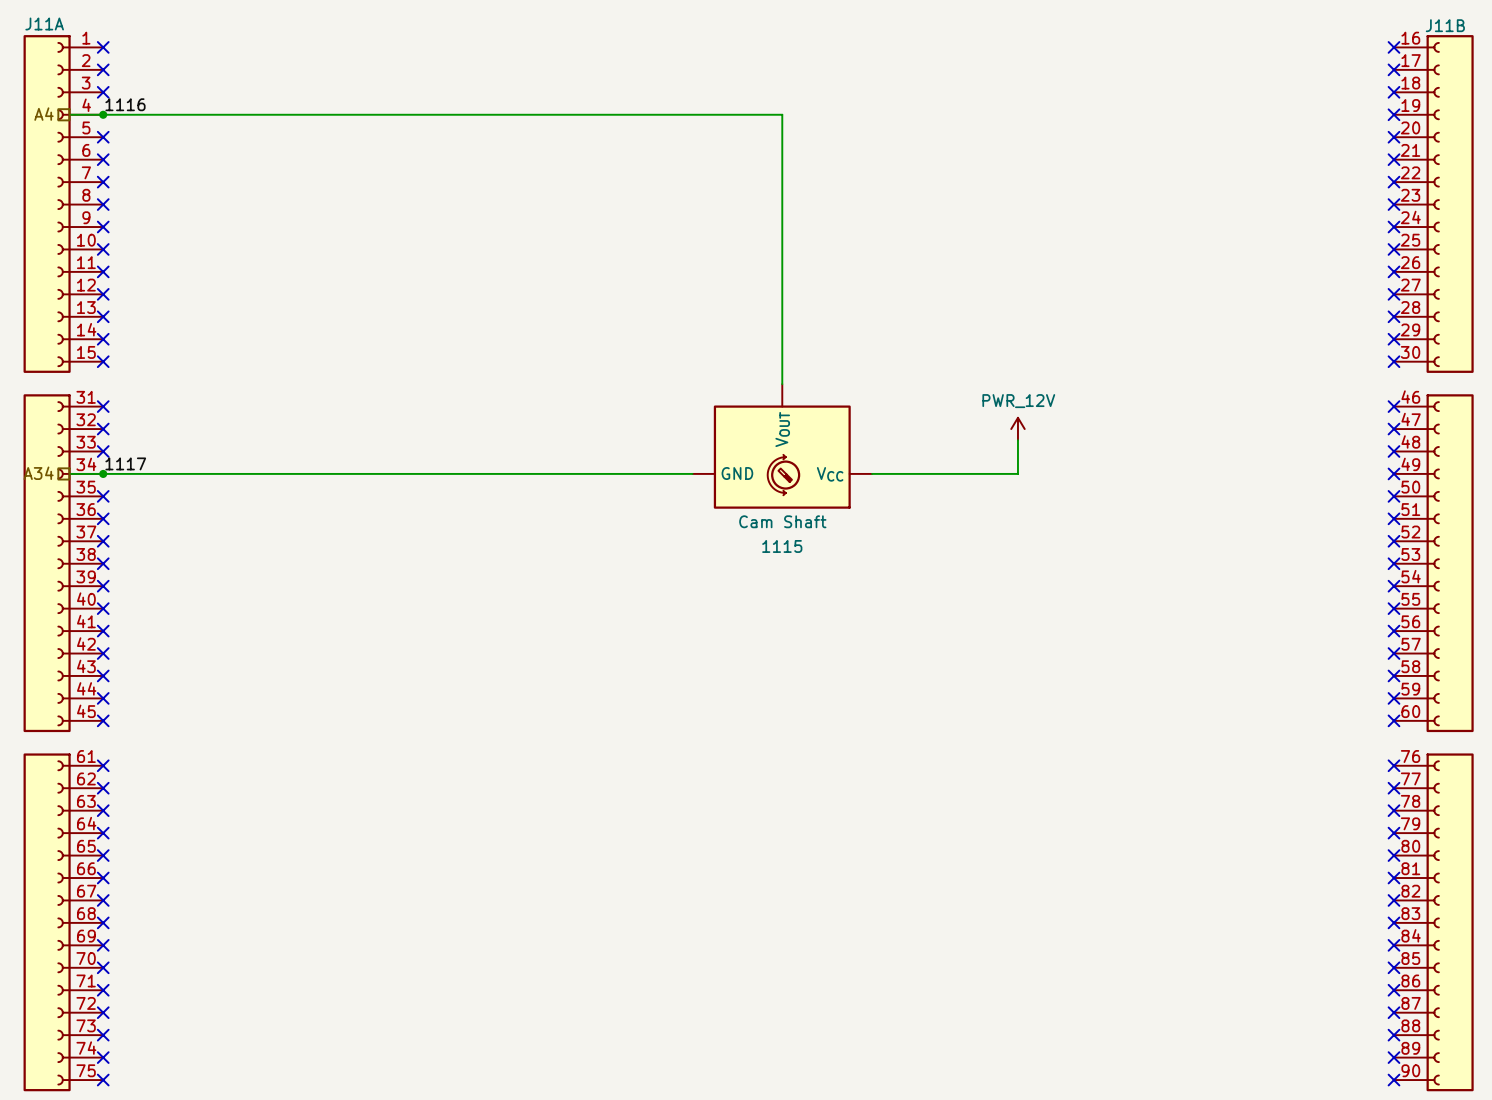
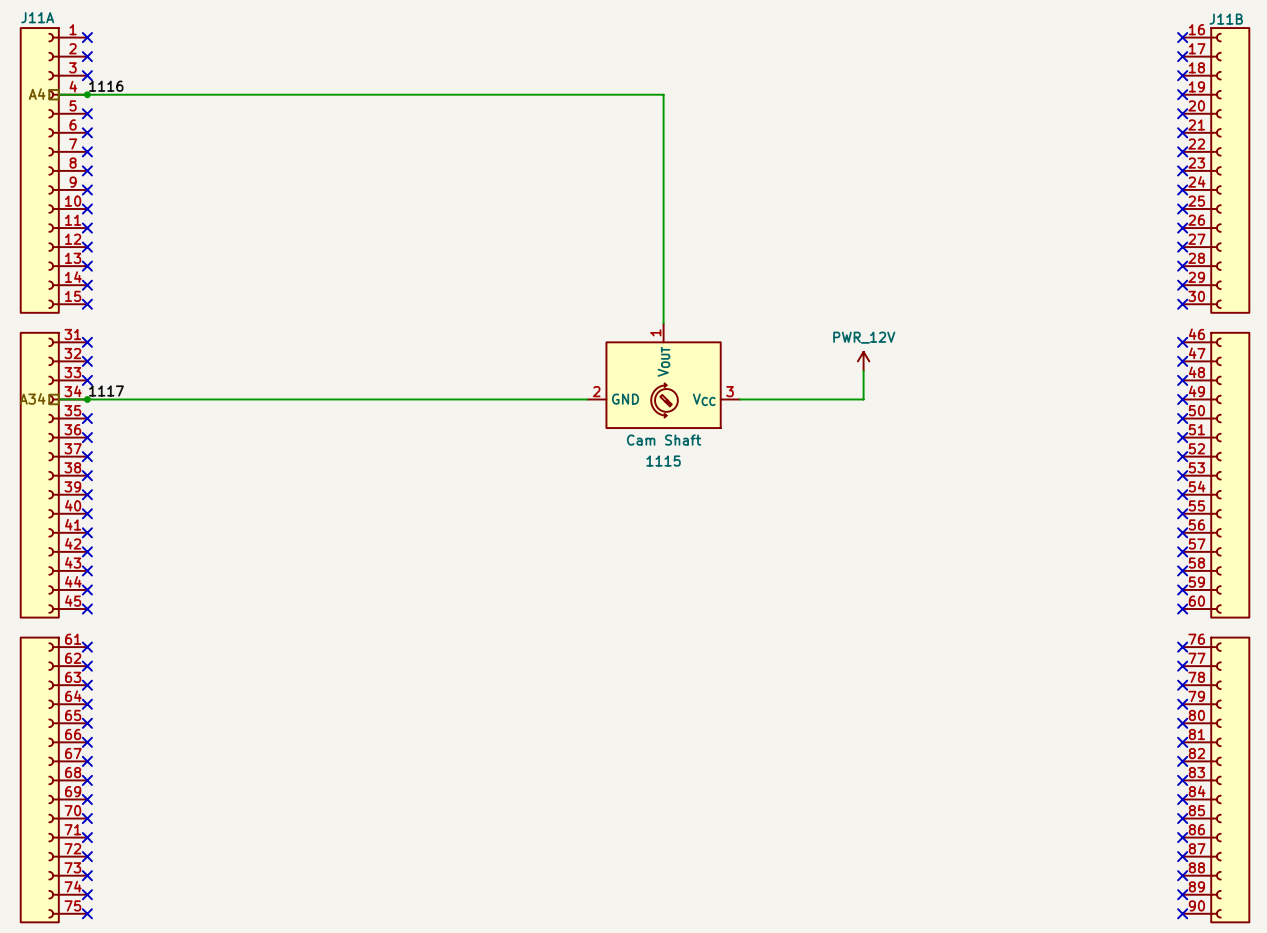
part pin number: none -> 1 (655, 332)
part pin number: none -> 2 (596, 391)
part pin number: none -> 3 (730, 391)

